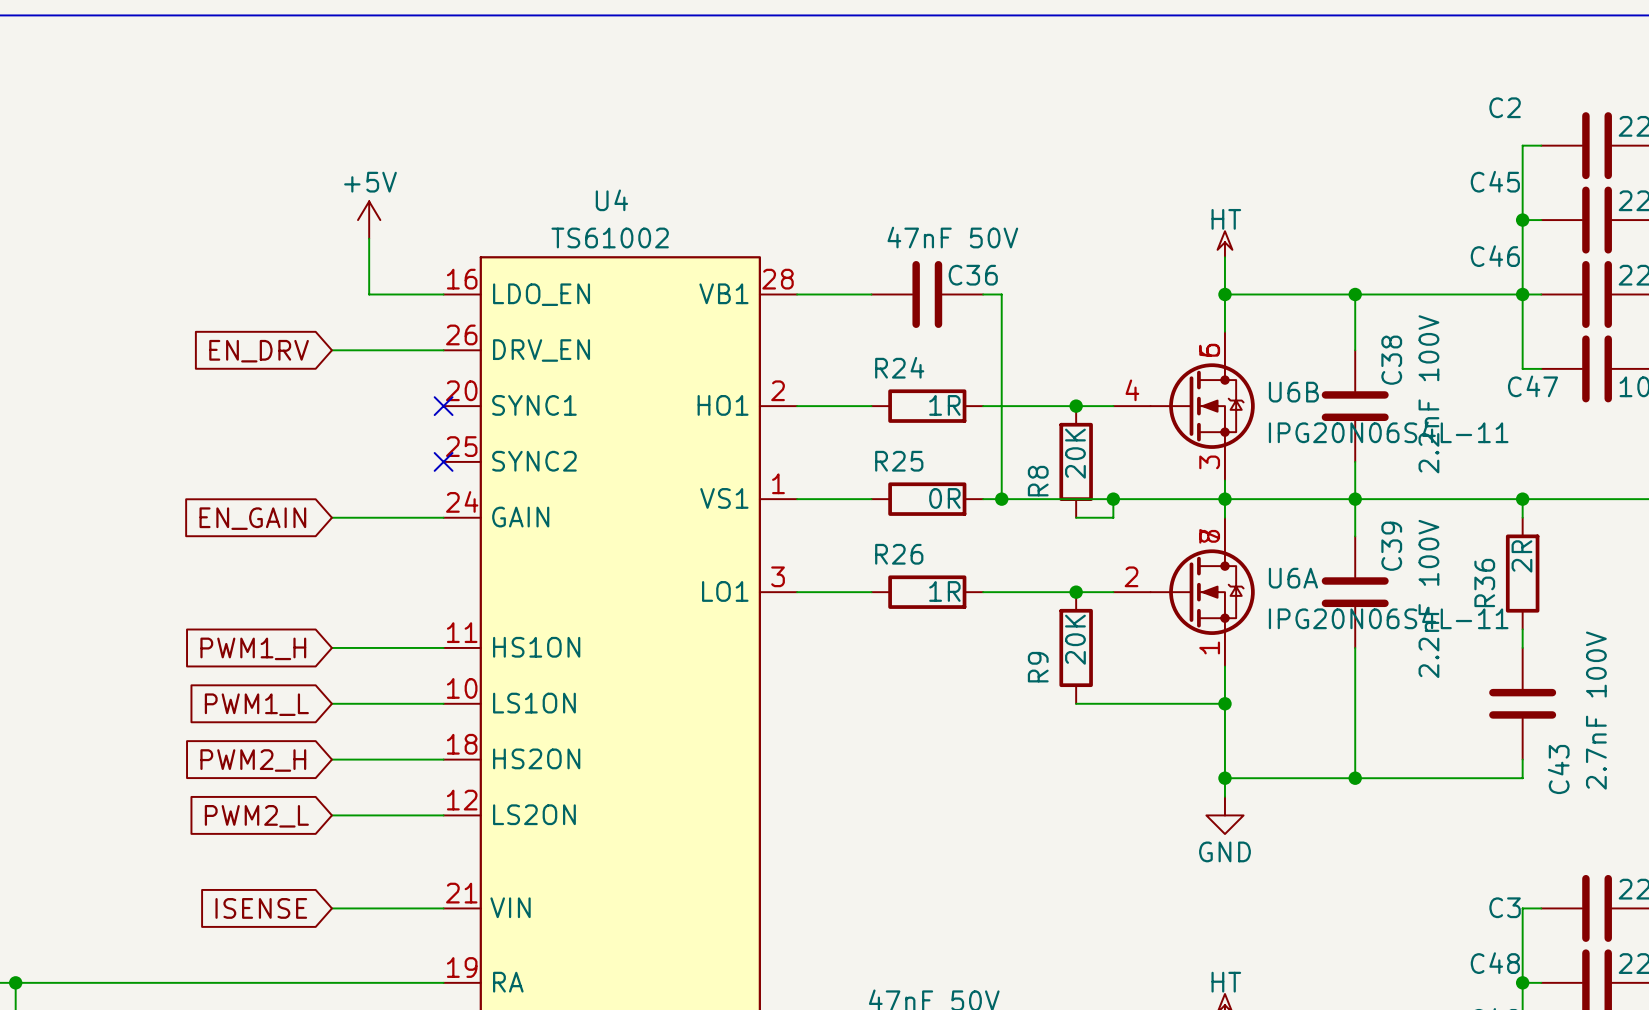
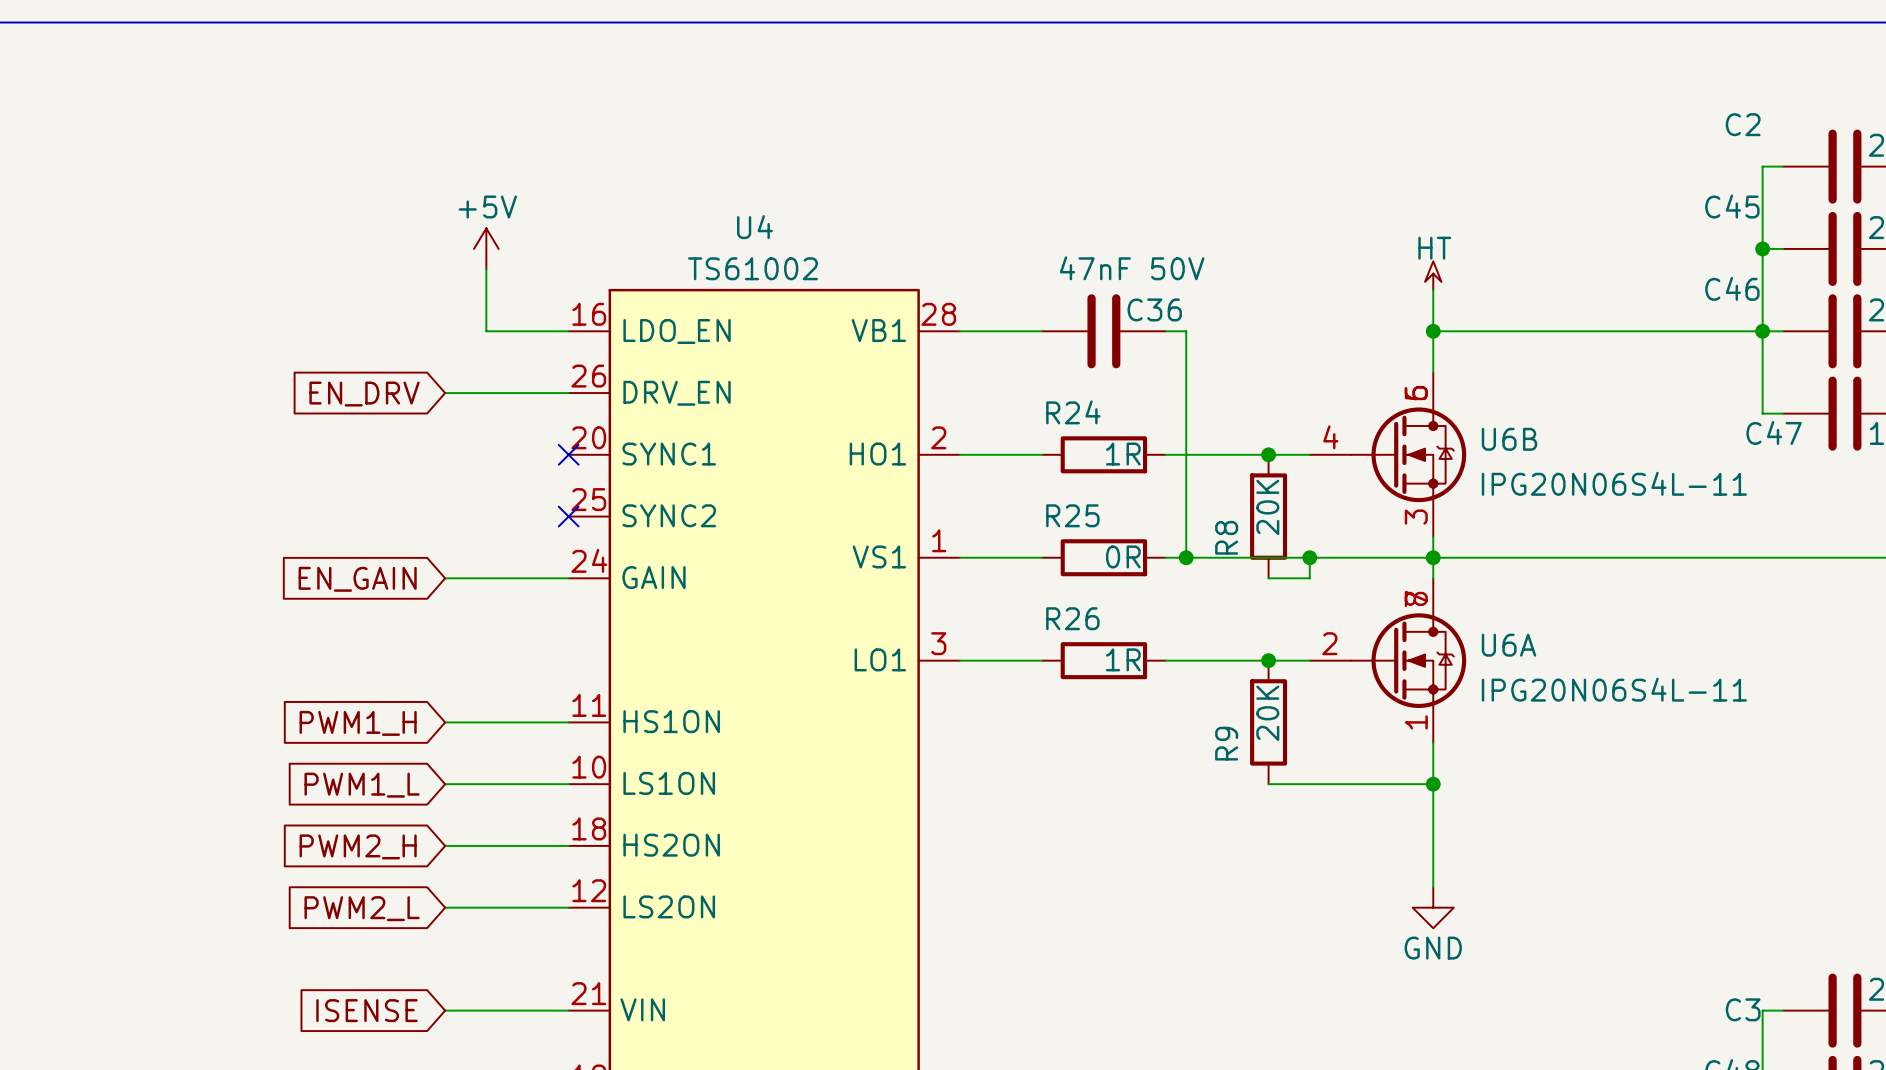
wire: (1355, 294) (1355, 350) -> none
junction: (1355, 294) -> none
C38: 2.2nF 100V (1355, 406) -> none
wire: (1355, 461) (1355, 536) -> none
junction: (1355, 499) -> none
wire: (1522, 499) (1522, 517) -> none
junction: (1522, 499) -> none
R36: 2R (1522, 573) -> none
C39: 2.2nF 100V (1355, 592) -> none
wire: (1522, 629) (1522, 647) -> none
wire: (1355, 647) (1355, 778) -> none
C43: 2.7nF 100V (1522, 703) -> none
wire: (1522, 759) (1522, 778) (1224, 778) -> none
junction: (1224, 778) -> none
junction: (1355, 778) -> none

